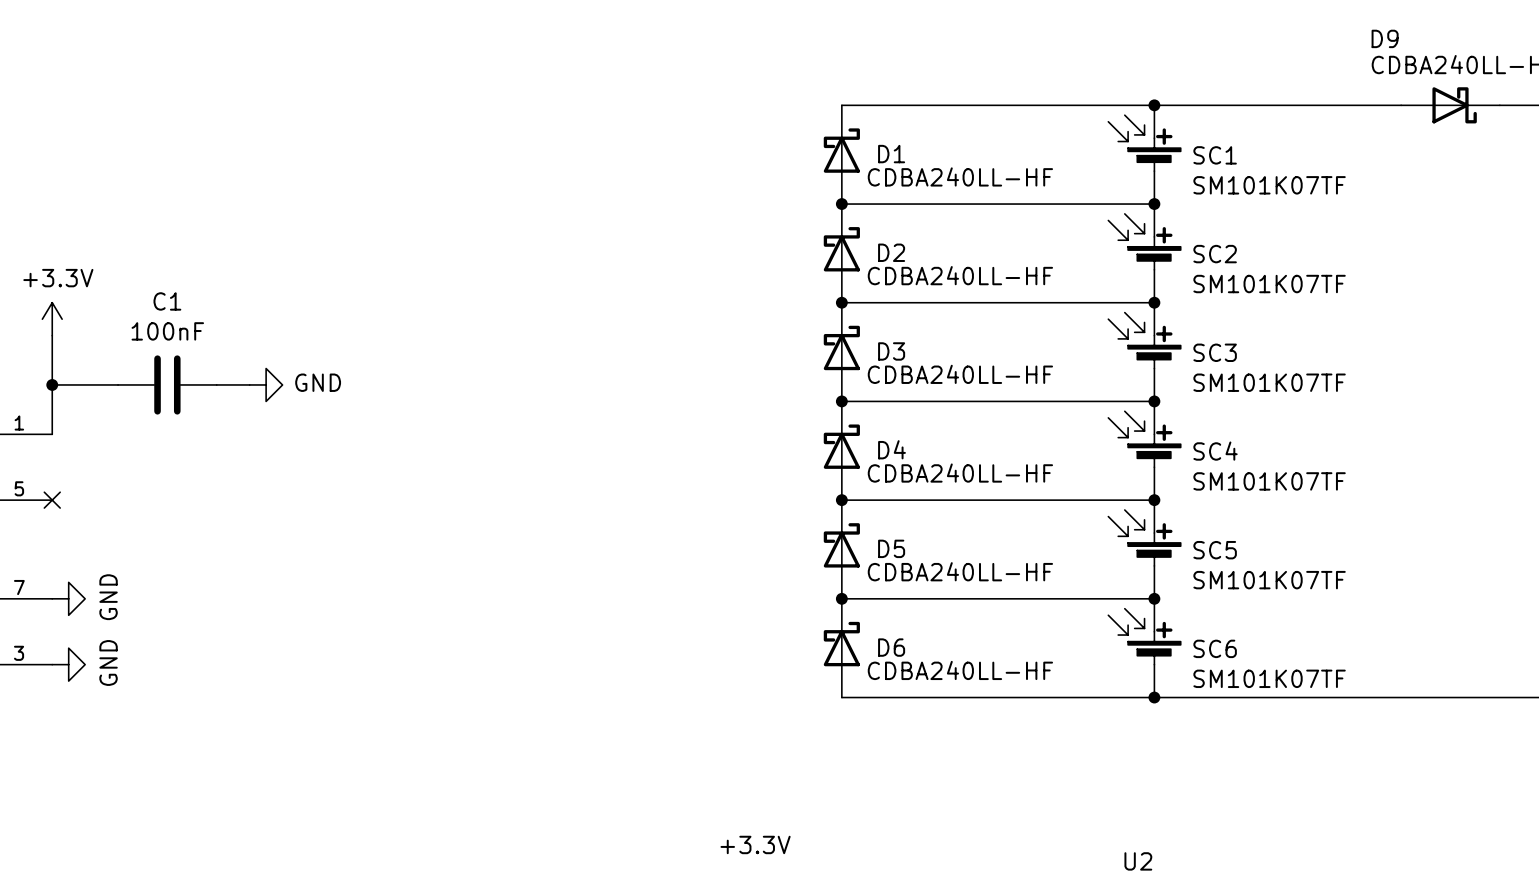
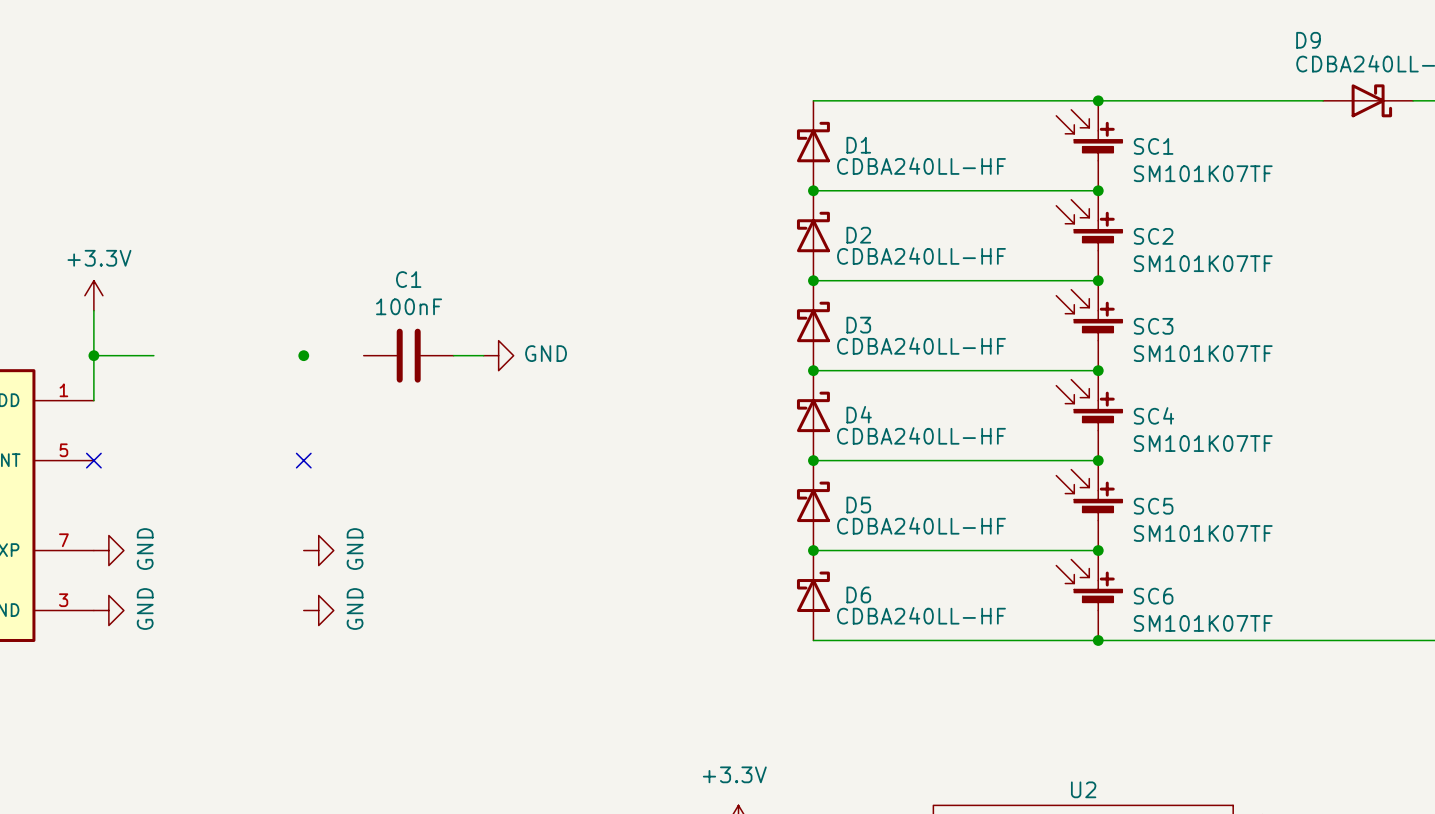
C1 position: (167, 384) -> (408, 355)
wire: (216, 384) (249, 384) -> (453, 355) (483, 355)
power symbol: GND (266, 384) -> none
junction: none -> (303, 355)
power symbol: none -> GND (498, 355)
no-connect mark: none -> (303, 460)
power symbol: none -> GND (318, 550)
power symbol: none -> GND (318, 610)

